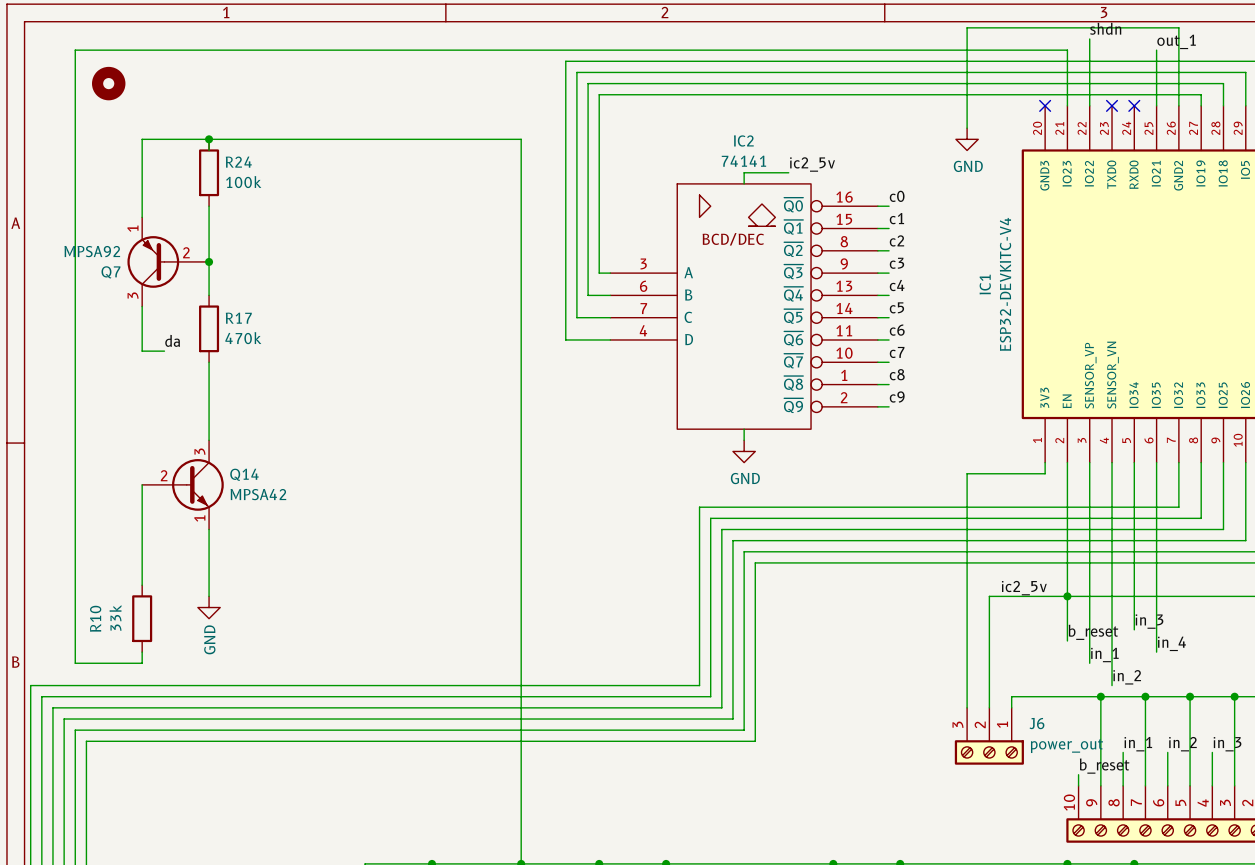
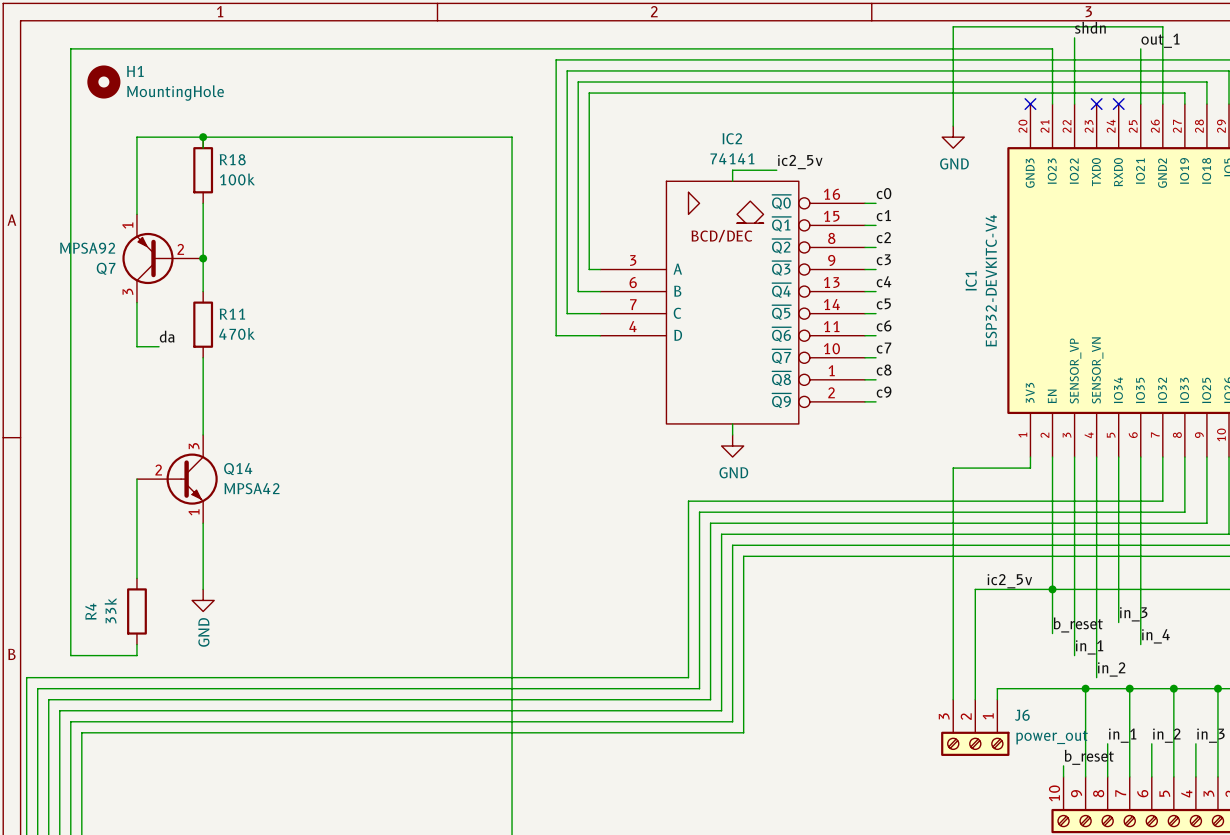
H1 name: none -> H1 (135, 71)
H1 value: none -> MountingHole (175, 93)
R24 name: R24 (238, 162) -> R18 (232, 159)
R17 name: R17 (238, 318) -> R11 (232, 314)
R10 name: R10 (95, 618) -> R4 (90, 611)

